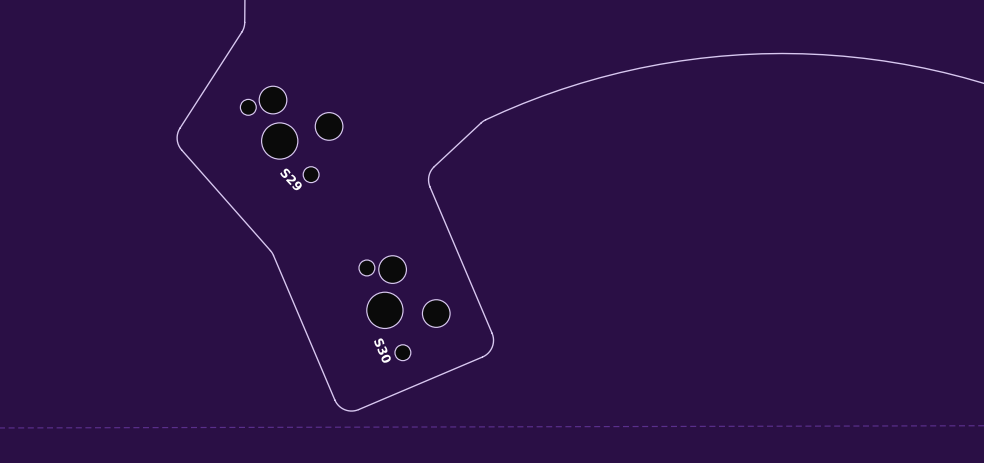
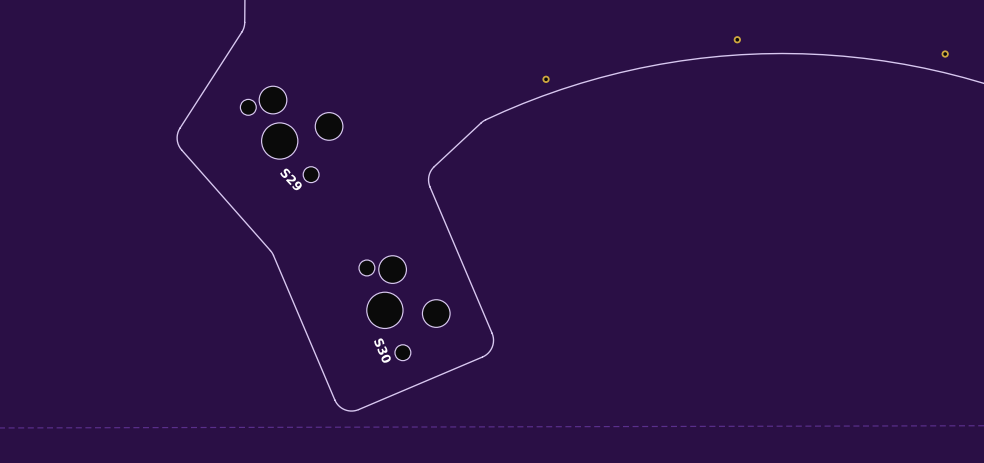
via: none -> (737, 39)
via: none -> (945, 54)
via: none -> (546, 79)

